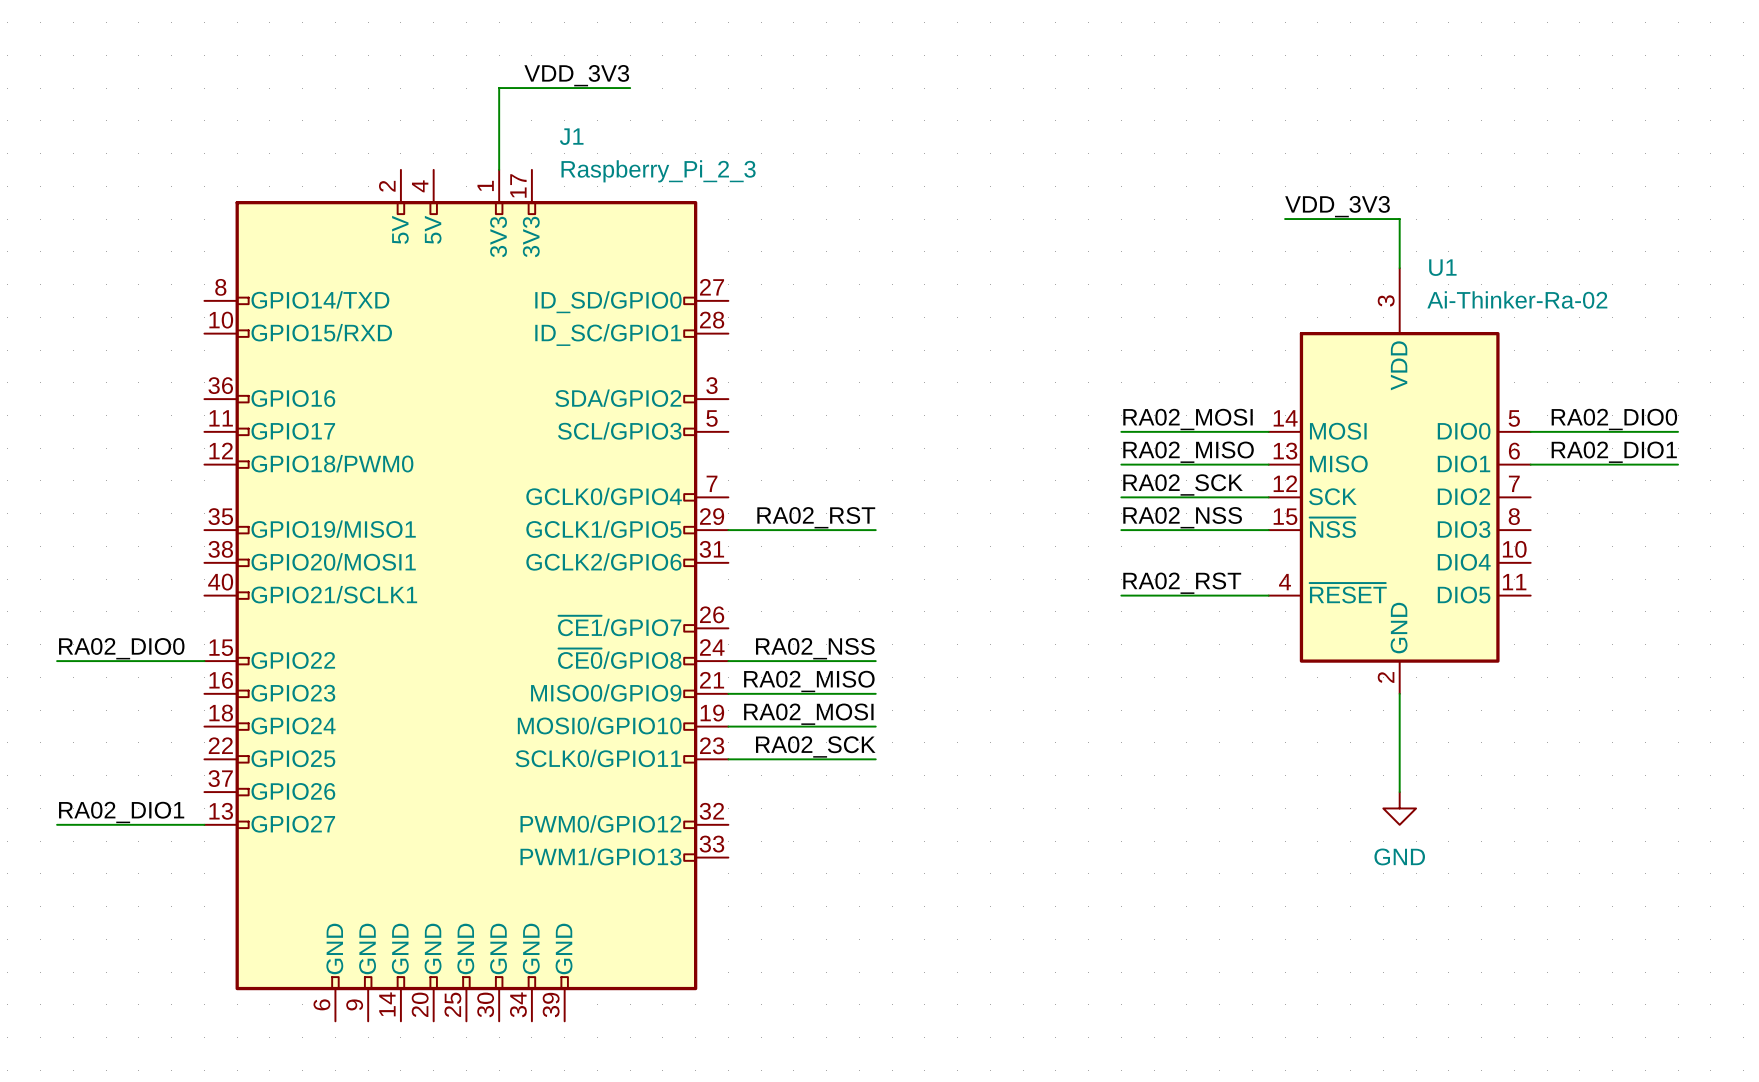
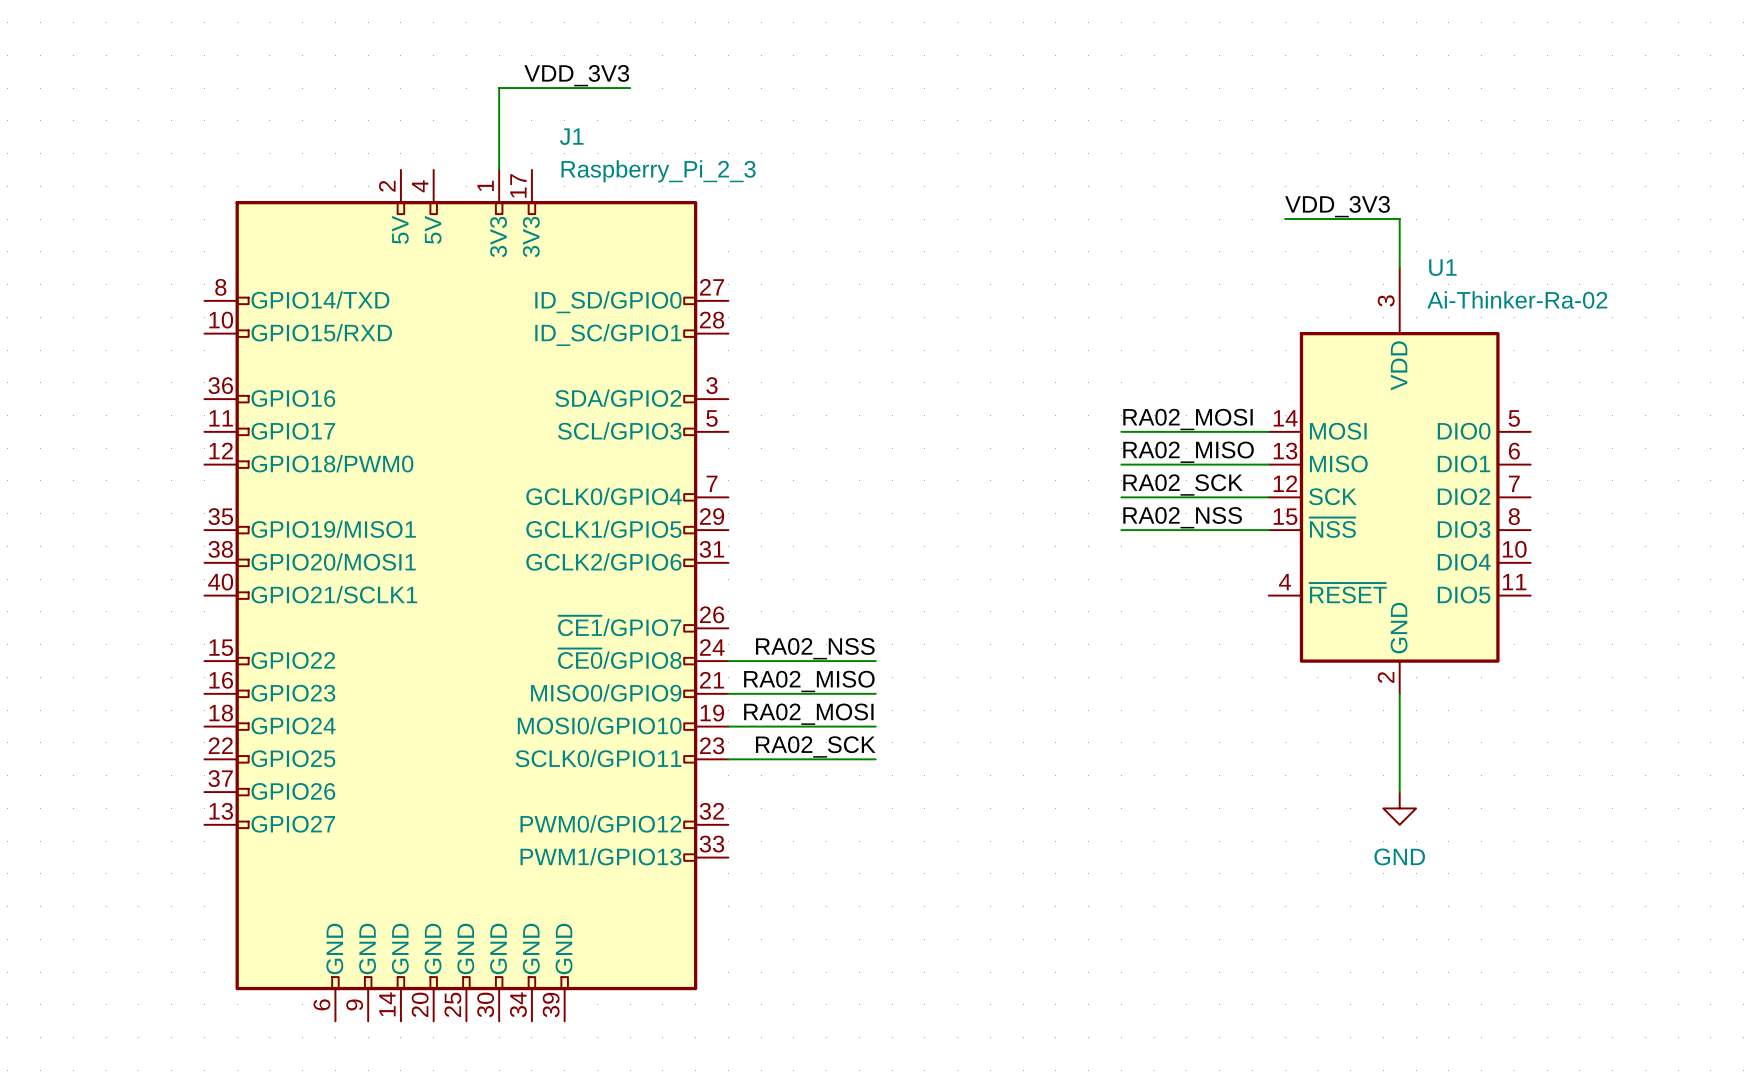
label: RA02_DIO0 (1614, 419) -> none
wire: (1530, 431) (1678, 431) -> none
label: RA02_DIO1 (1614, 452) -> none
wire: (1530, 464) (1678, 464) -> none
label: RA02_RST (816, 517) -> none
wire: (728, 530) (875, 530) -> none
label: RA02_RST (1182, 583) -> none
wire: (1121, 595) (1268, 595) -> none
label: RA02_DIO0 (121, 648) -> none
wire: (57, 661) (204, 661) -> none
label: RA02_DIO1 (121, 812) -> none
wire: (57, 824) (204, 824) -> none

